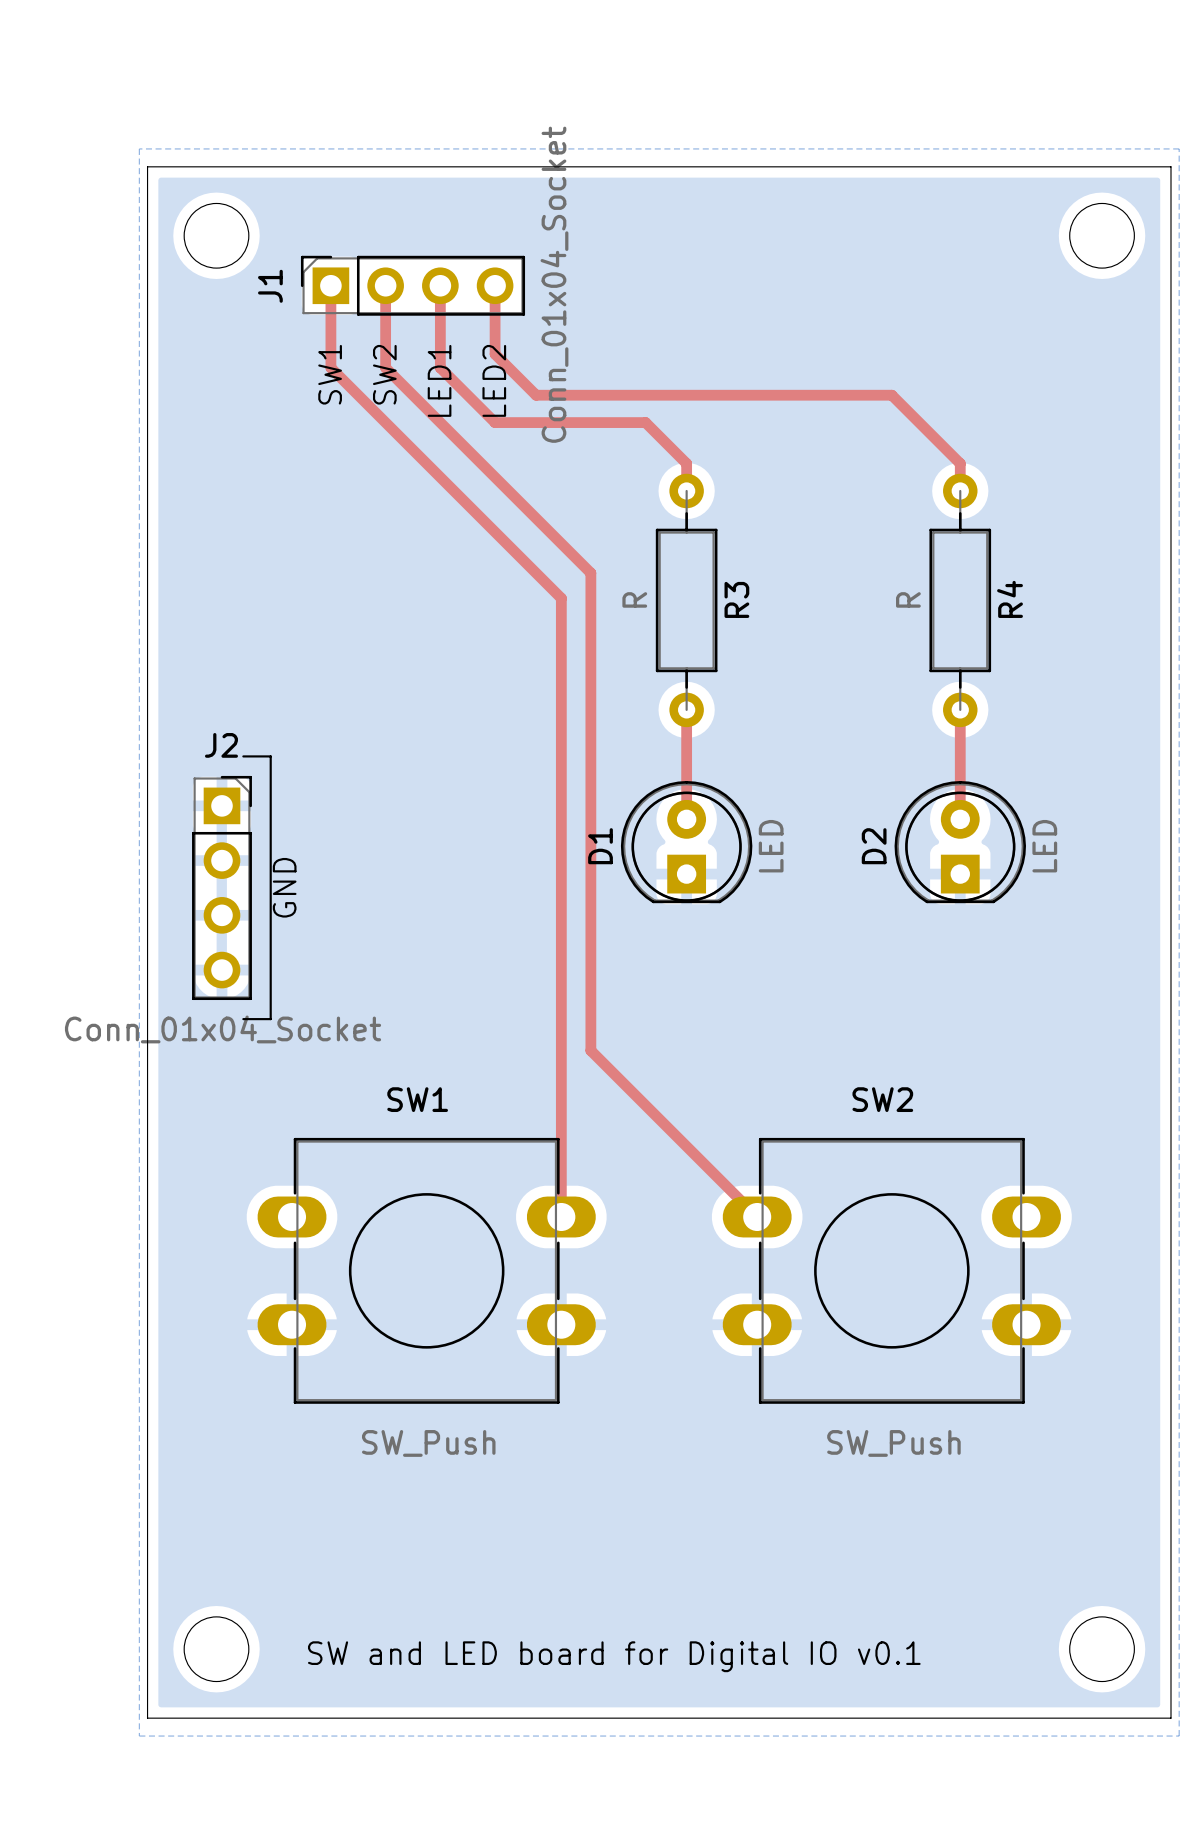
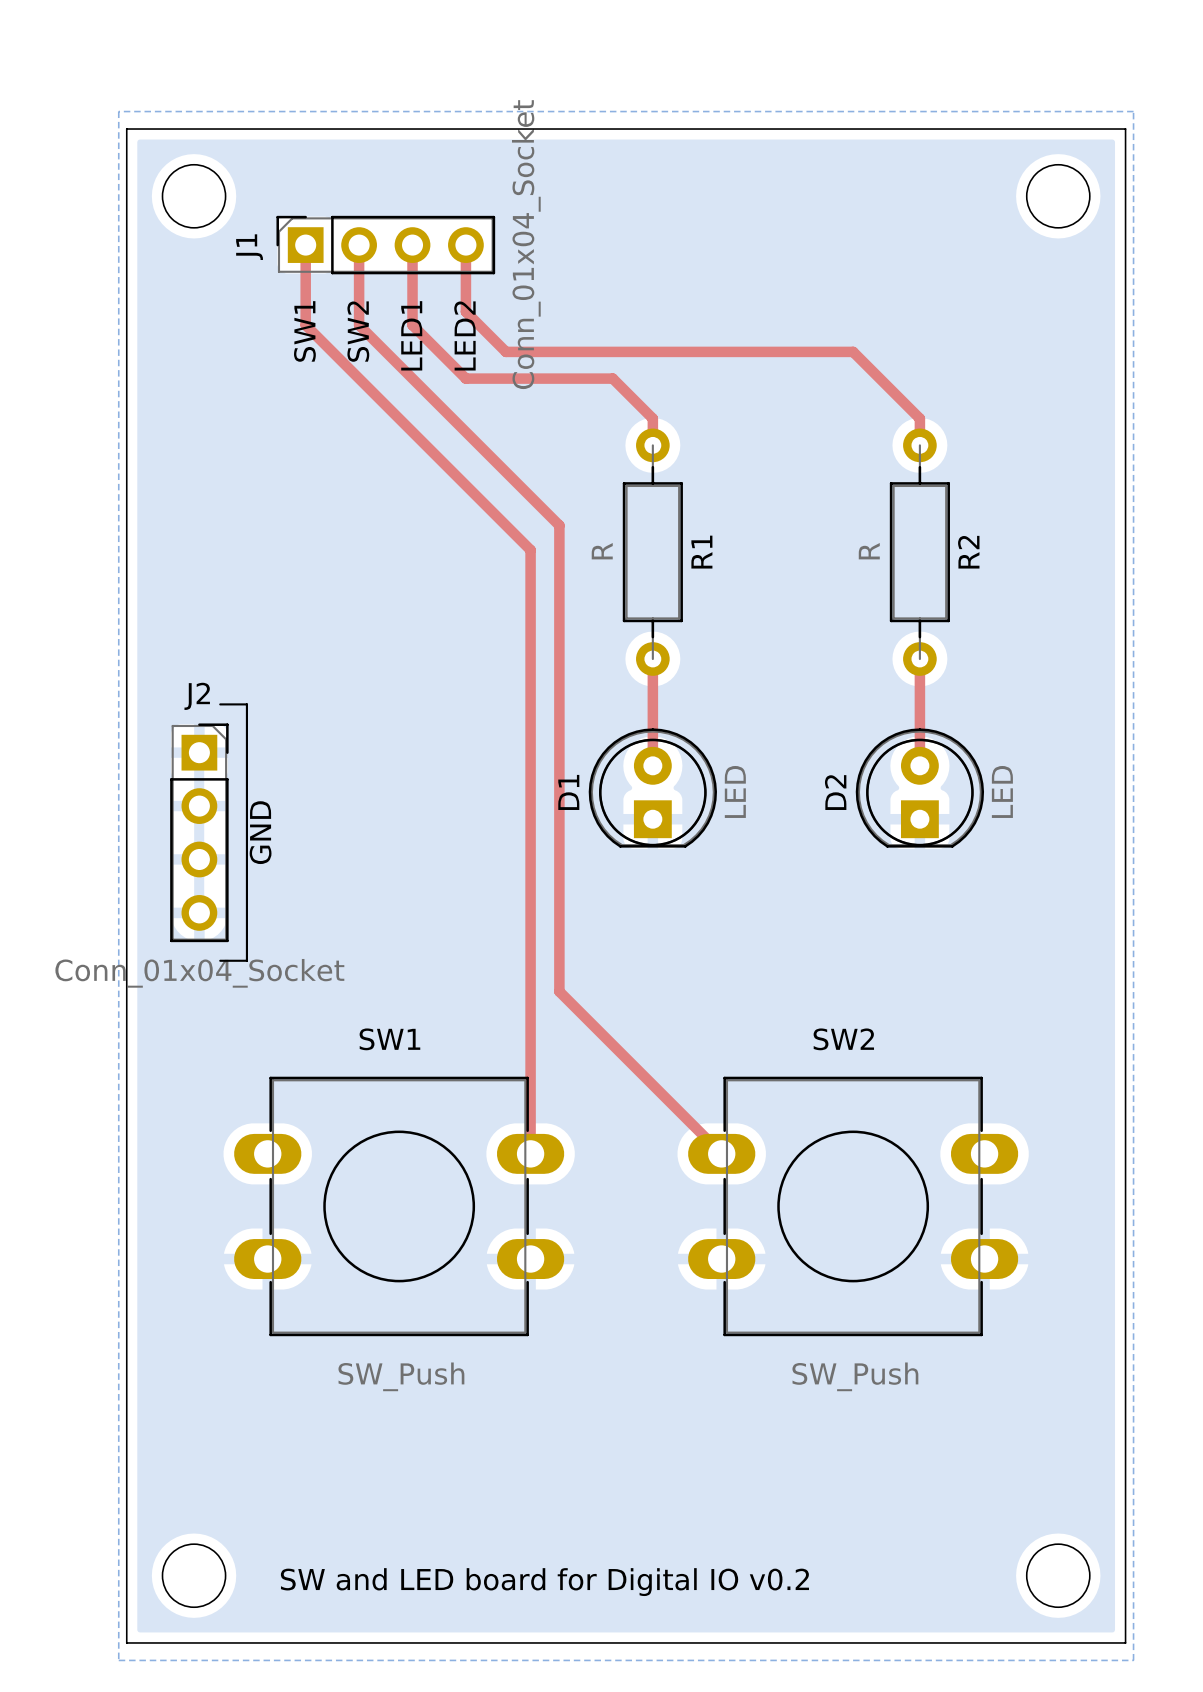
R3 name: R3 (736, 599) -> R1 (701, 552)
R4 name: R4 (1010, 599) -> R2 (968, 552)
text: SW and LED board for Digital IO v0.1 (614, 1656) -> SW and LED board for Digital IO v0.2 (544, 1582)

